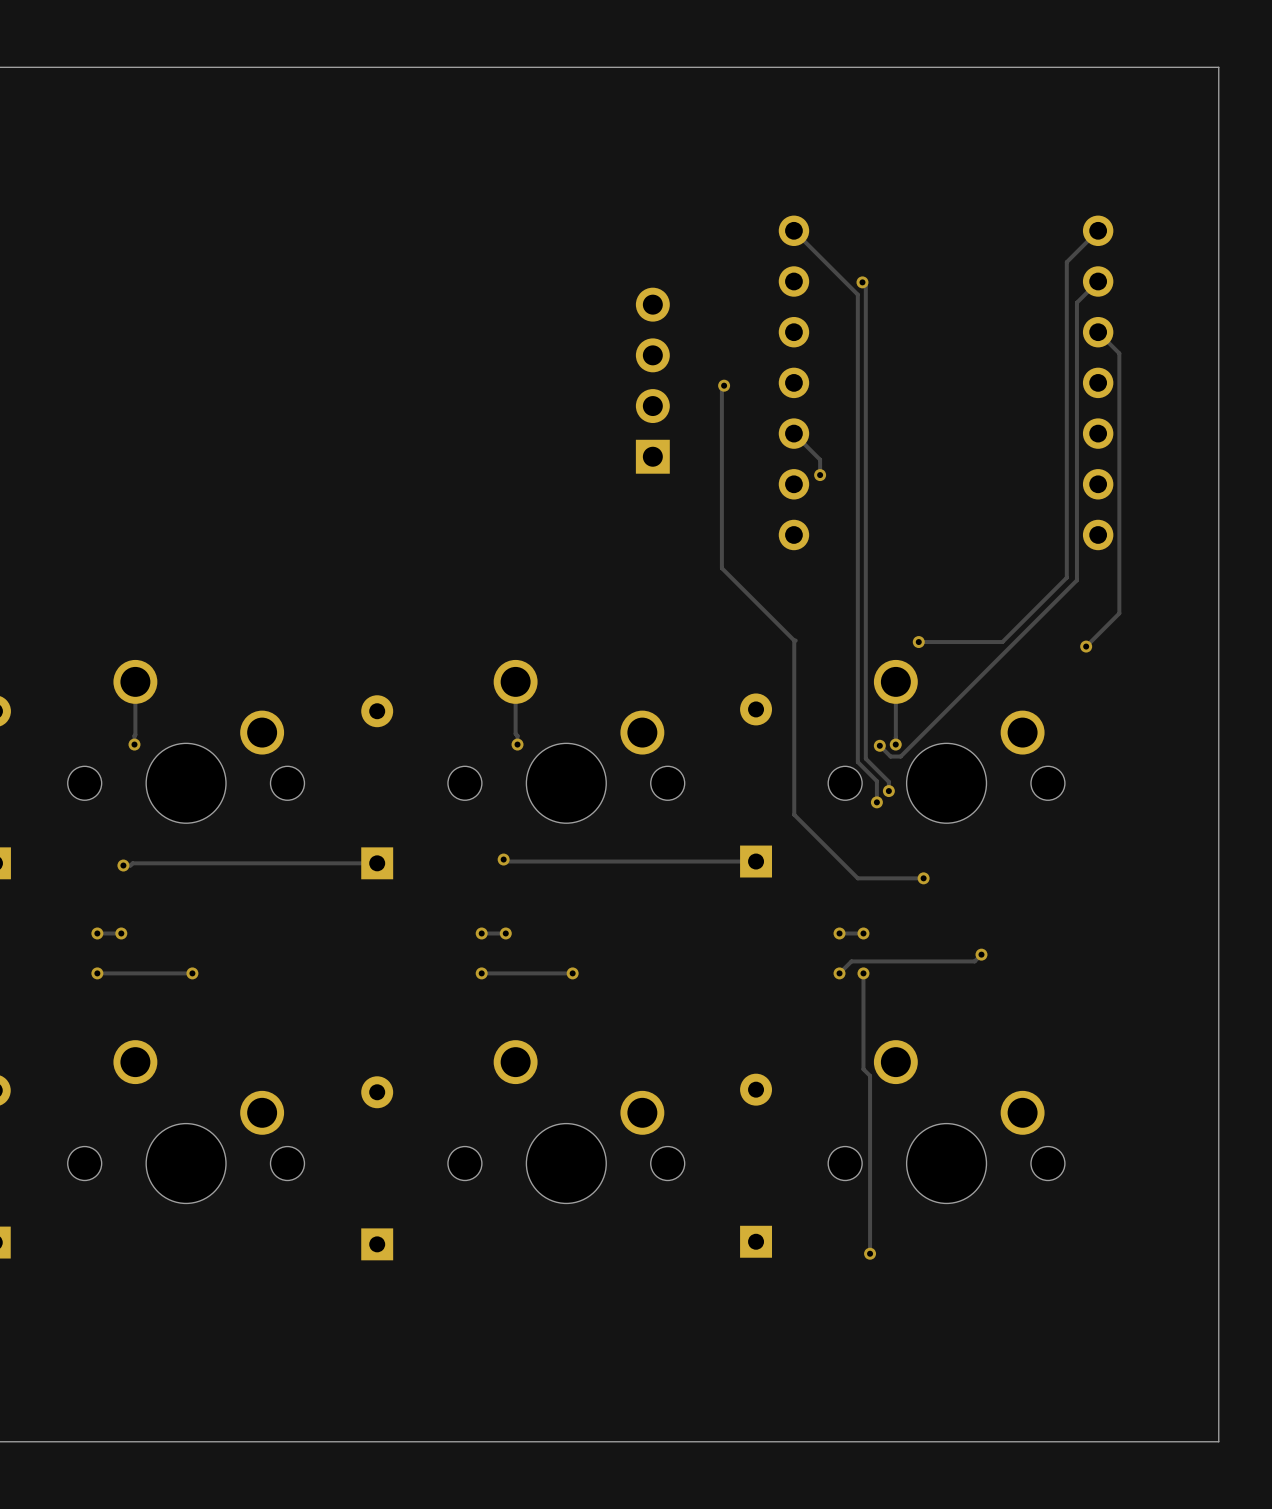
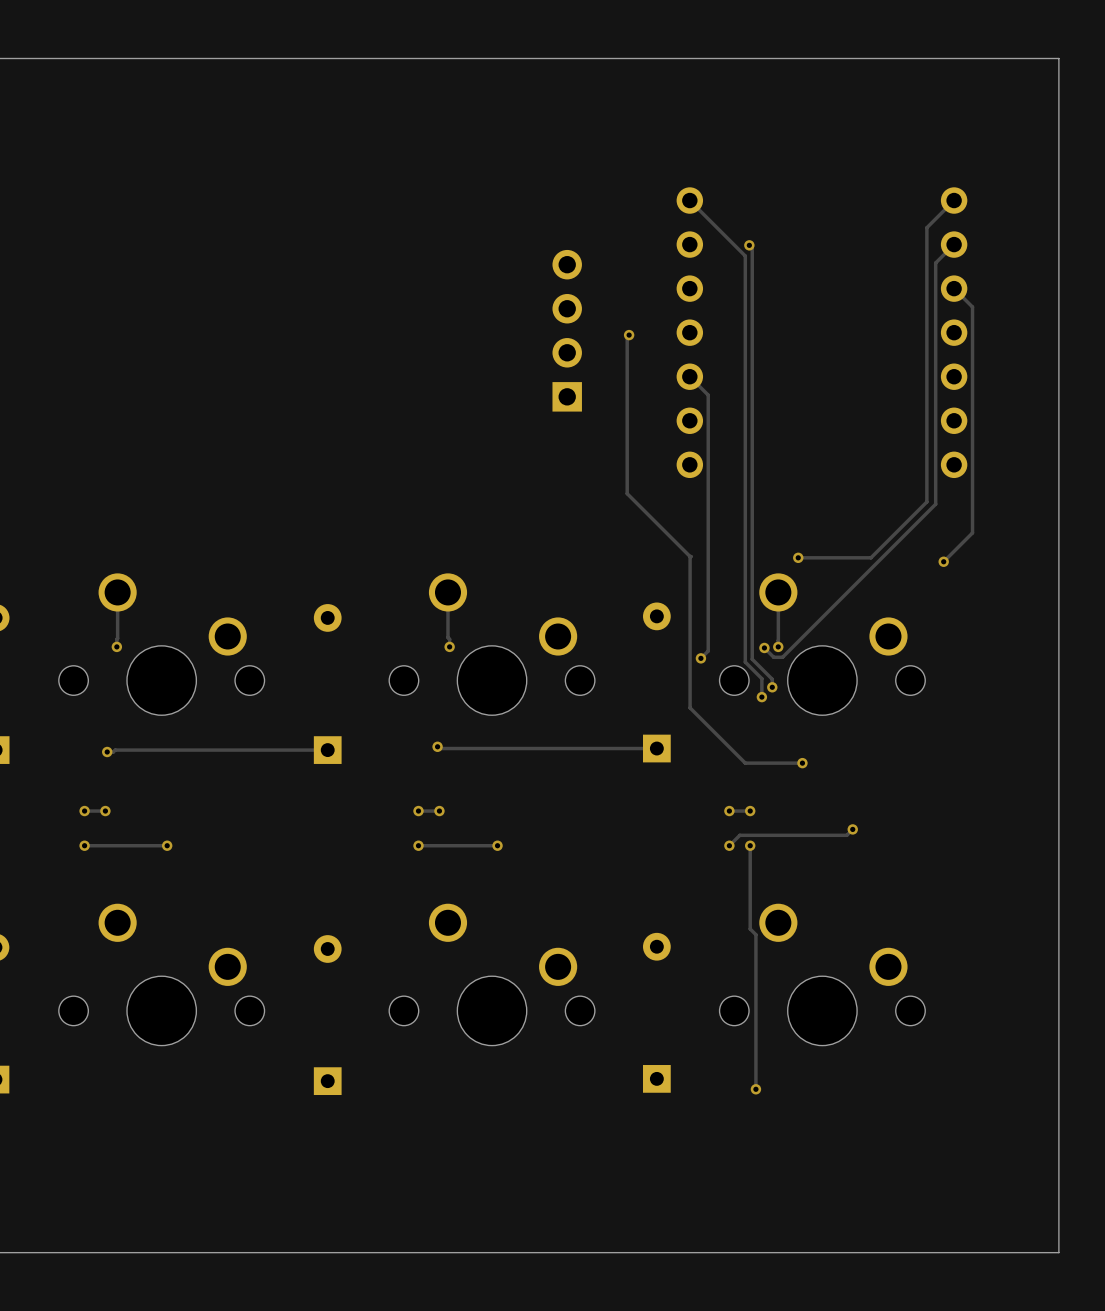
track: (815, 454) (820, 459) (820, 475) -> (708, 395) (708, 651) (700, 658)
via: (820, 475) -> none
via: none -> (700, 658)

